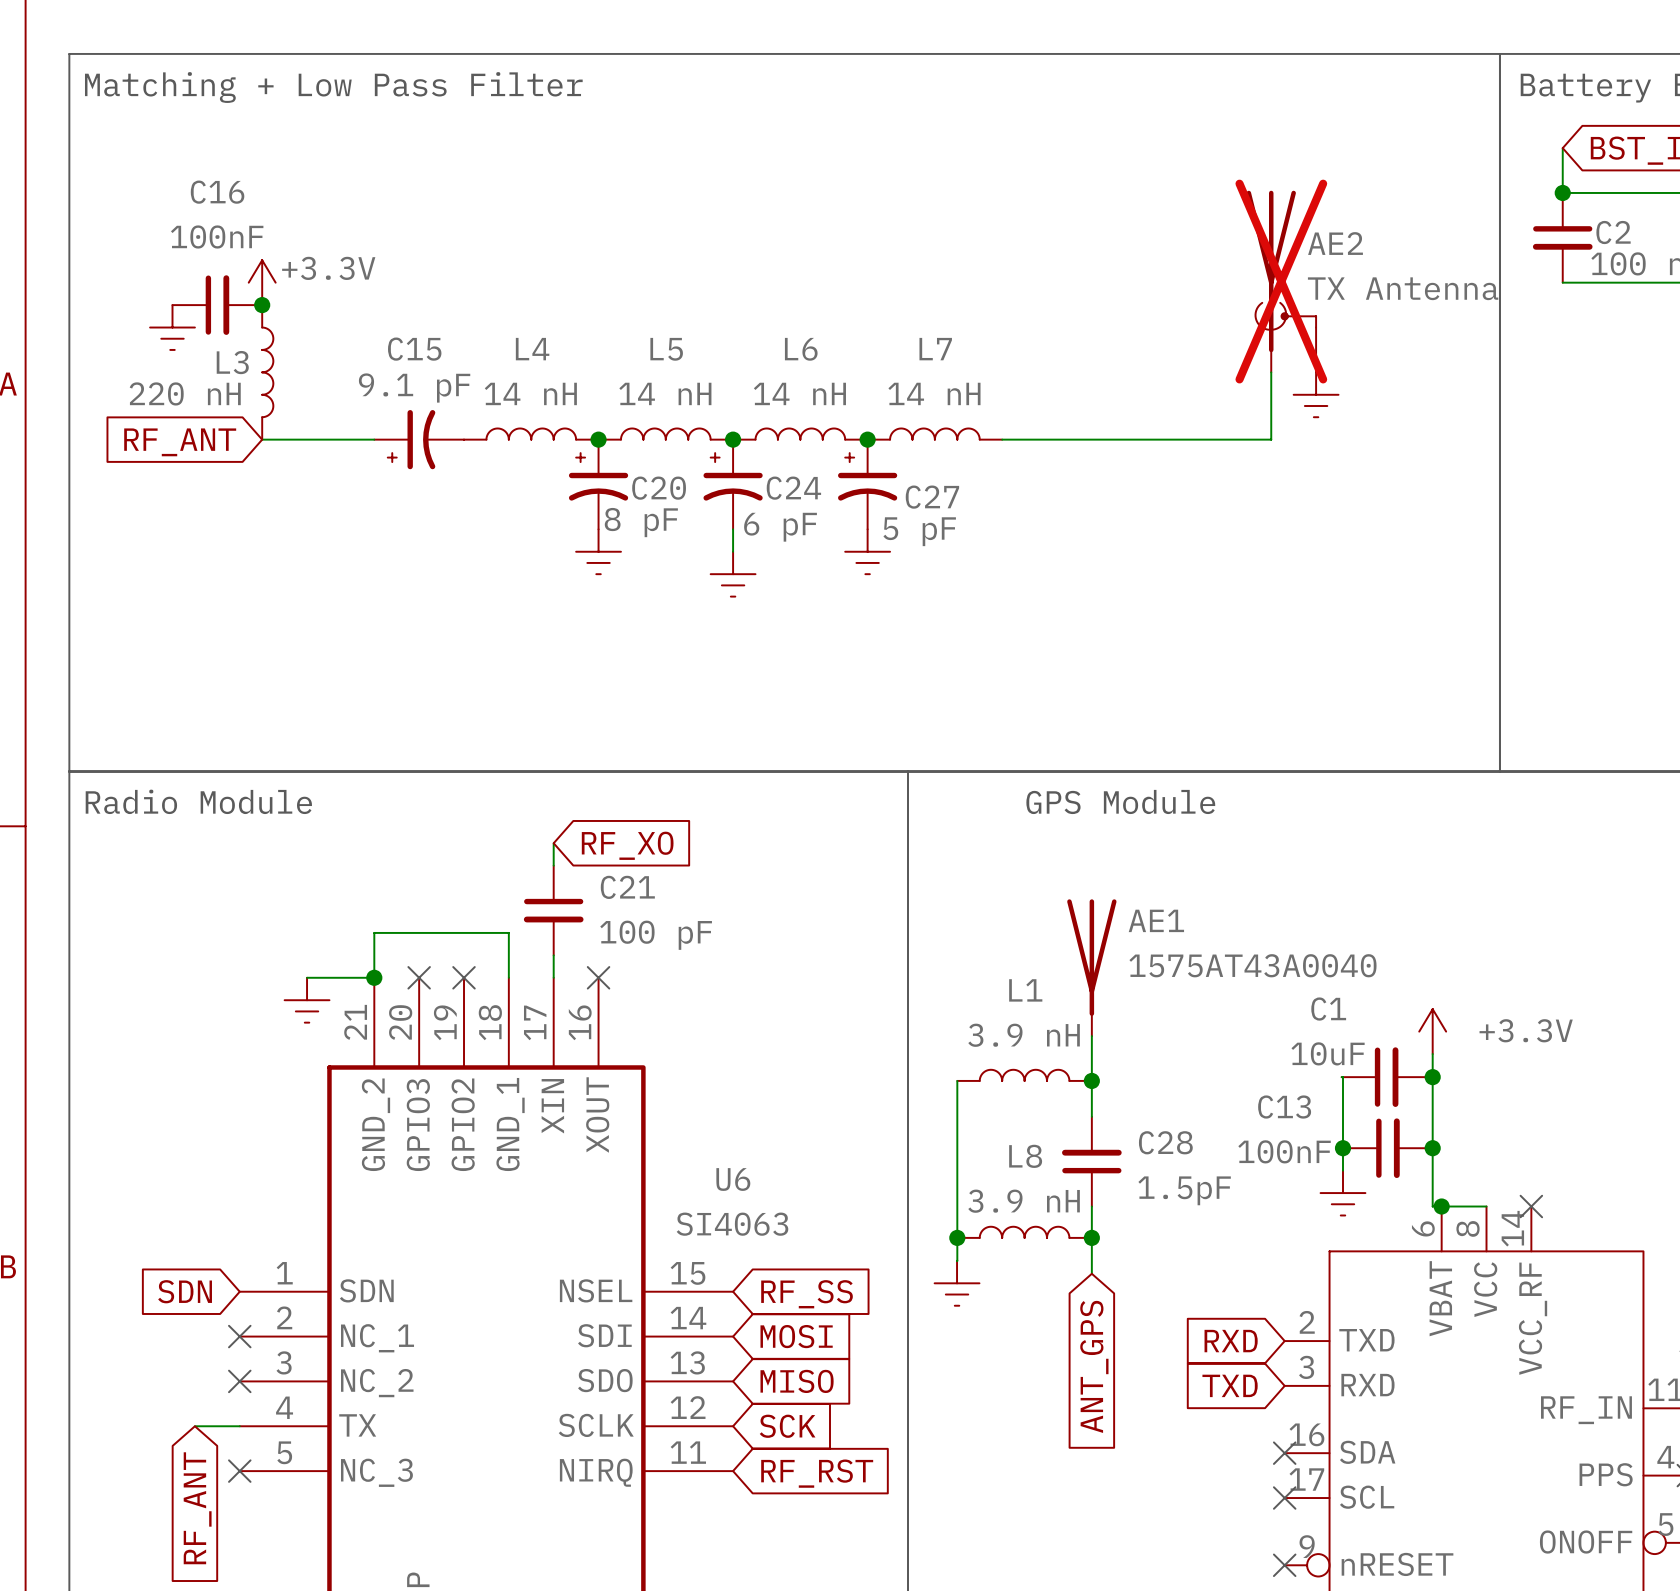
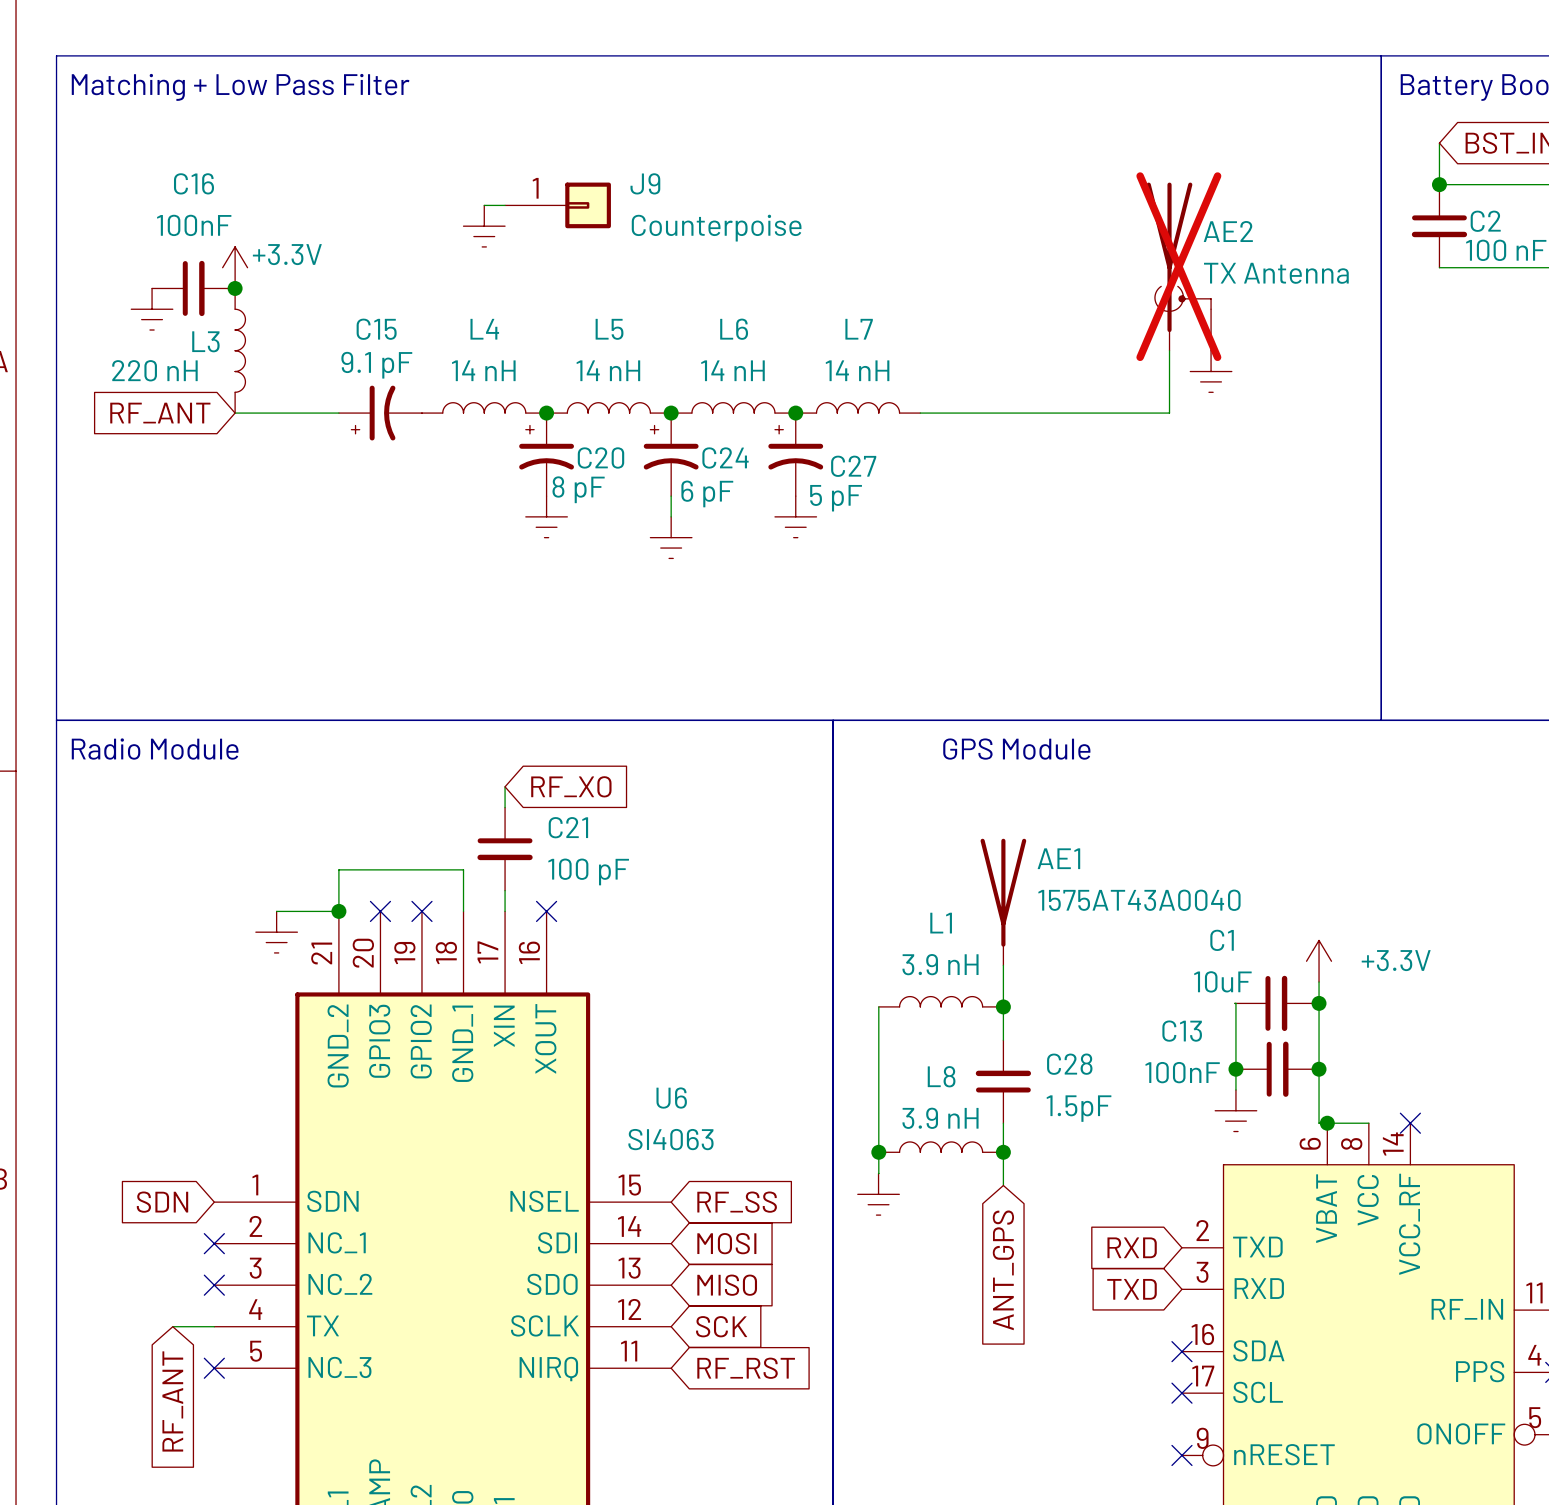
wire: none -> (484, 205) (505, 205)
J9: none -> Counterpoise (557, 205)
power symbol: none -> (484, 226)

